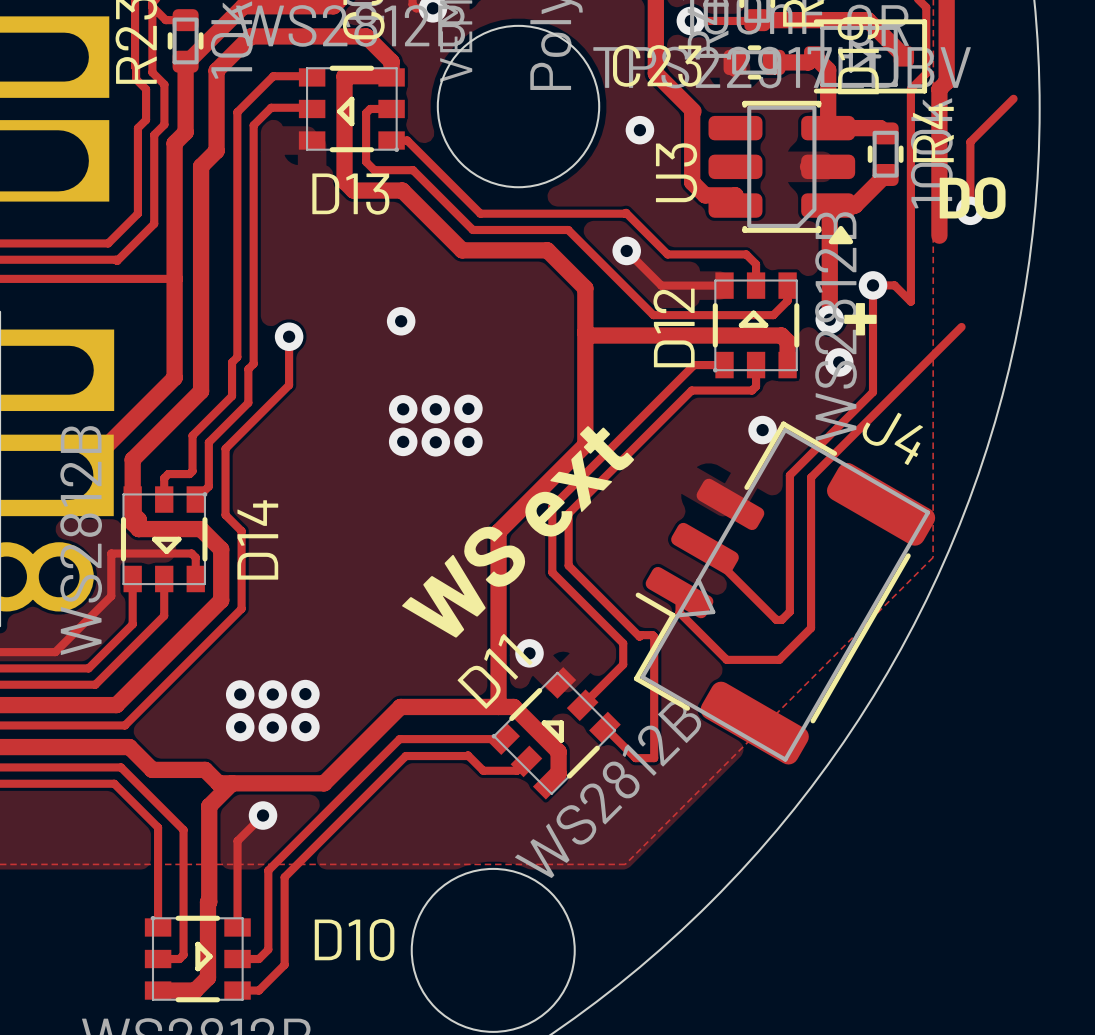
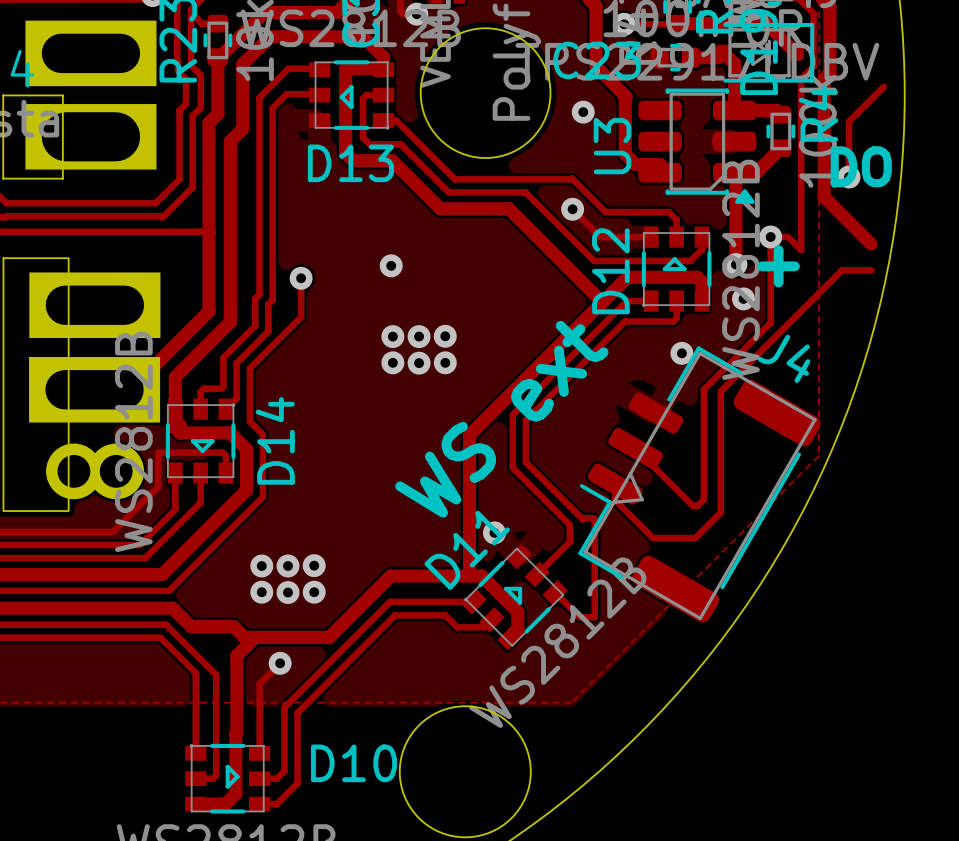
track: none -> (824, 197) (871, 244)
track: (585, 288) (585, 445) -> (539, 239) (601, 303)
track: none -> (841, 270) (871, 270)
track: (585, 332) (588, 335) (694, 335) -> (539, 365) (627, 277)

